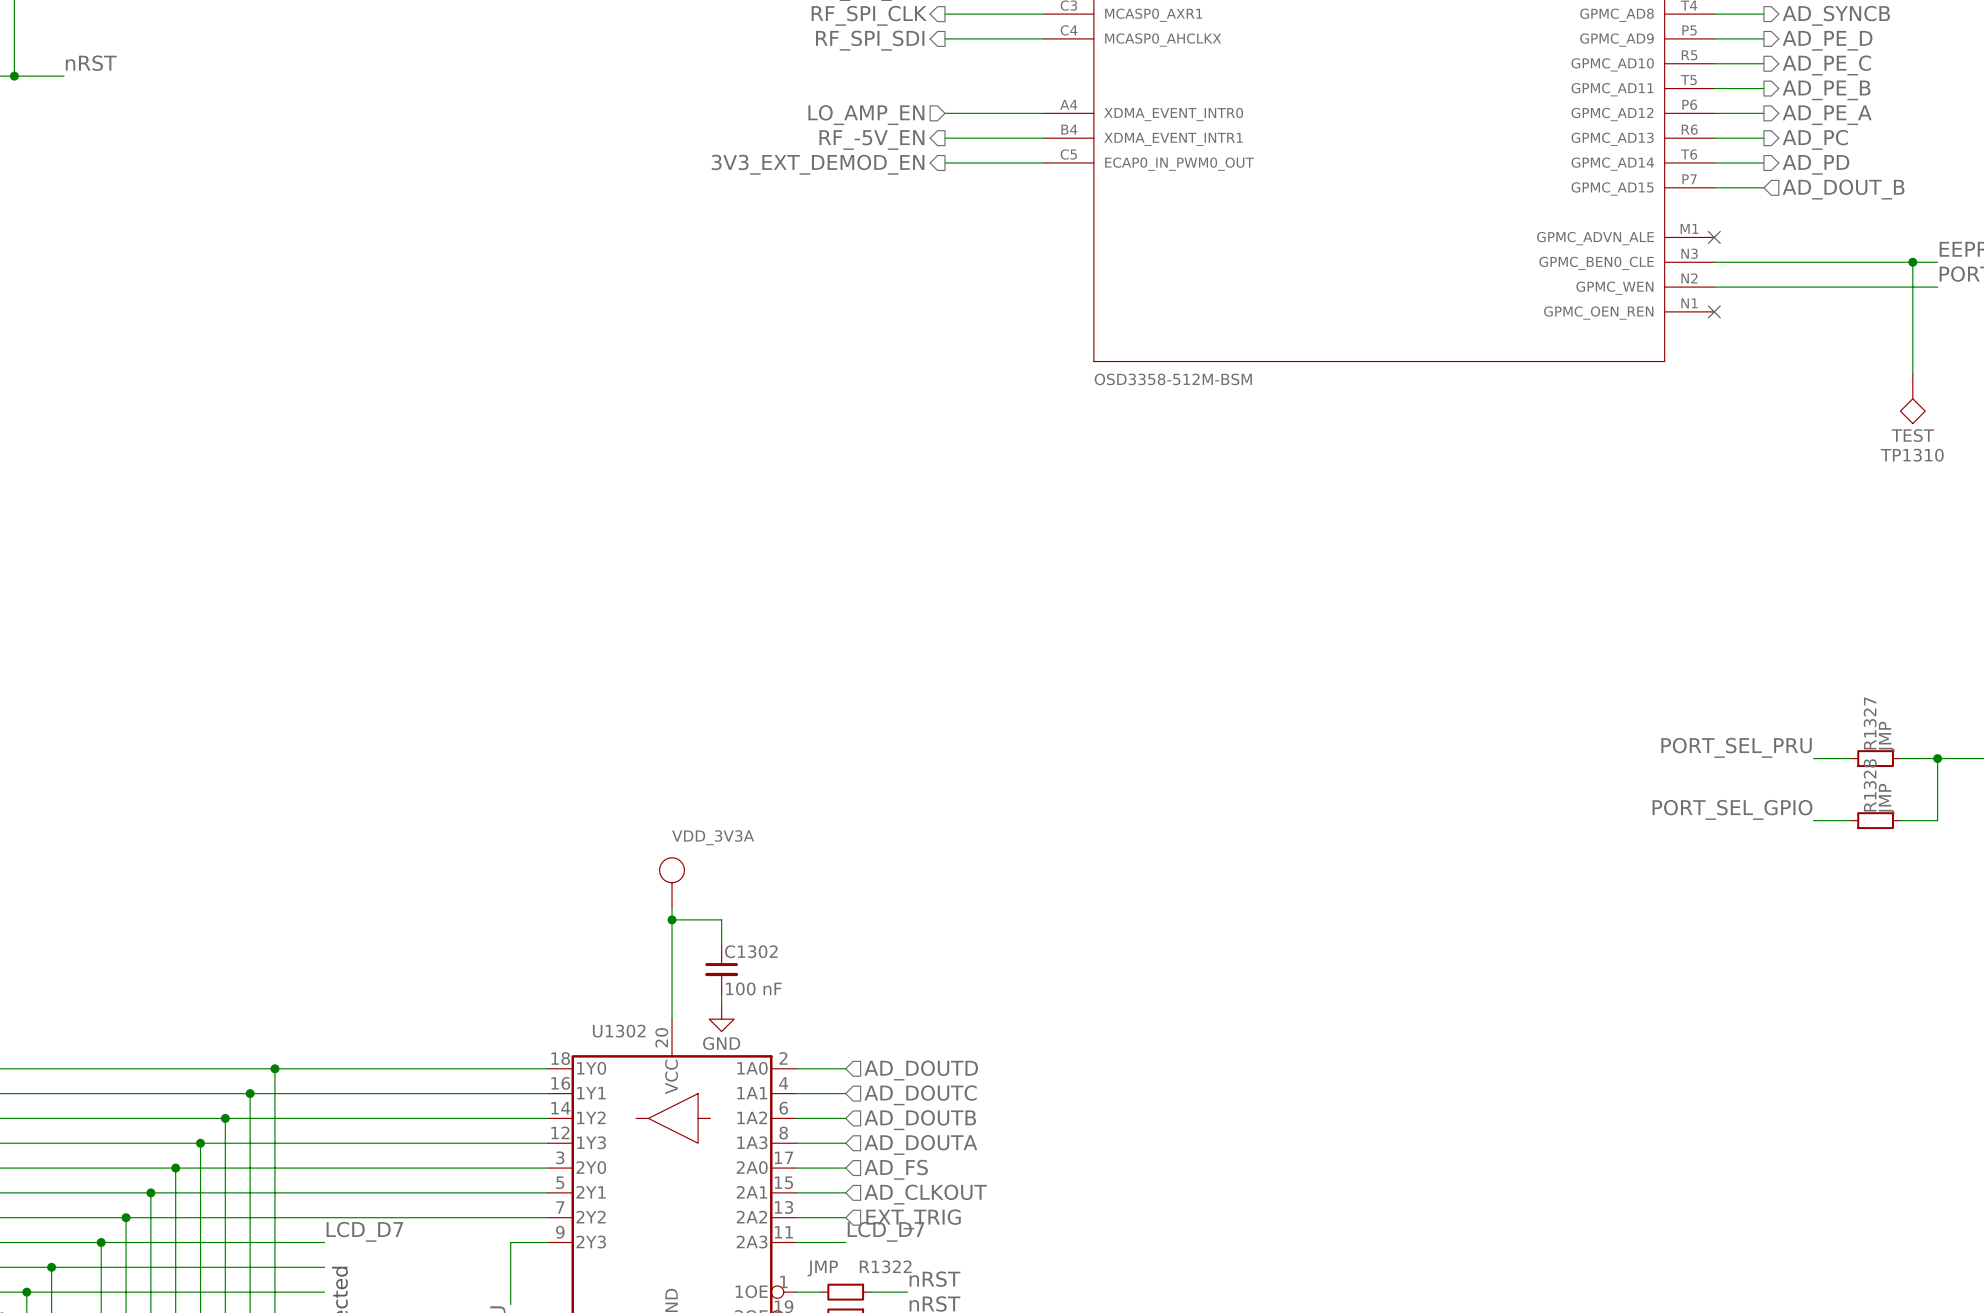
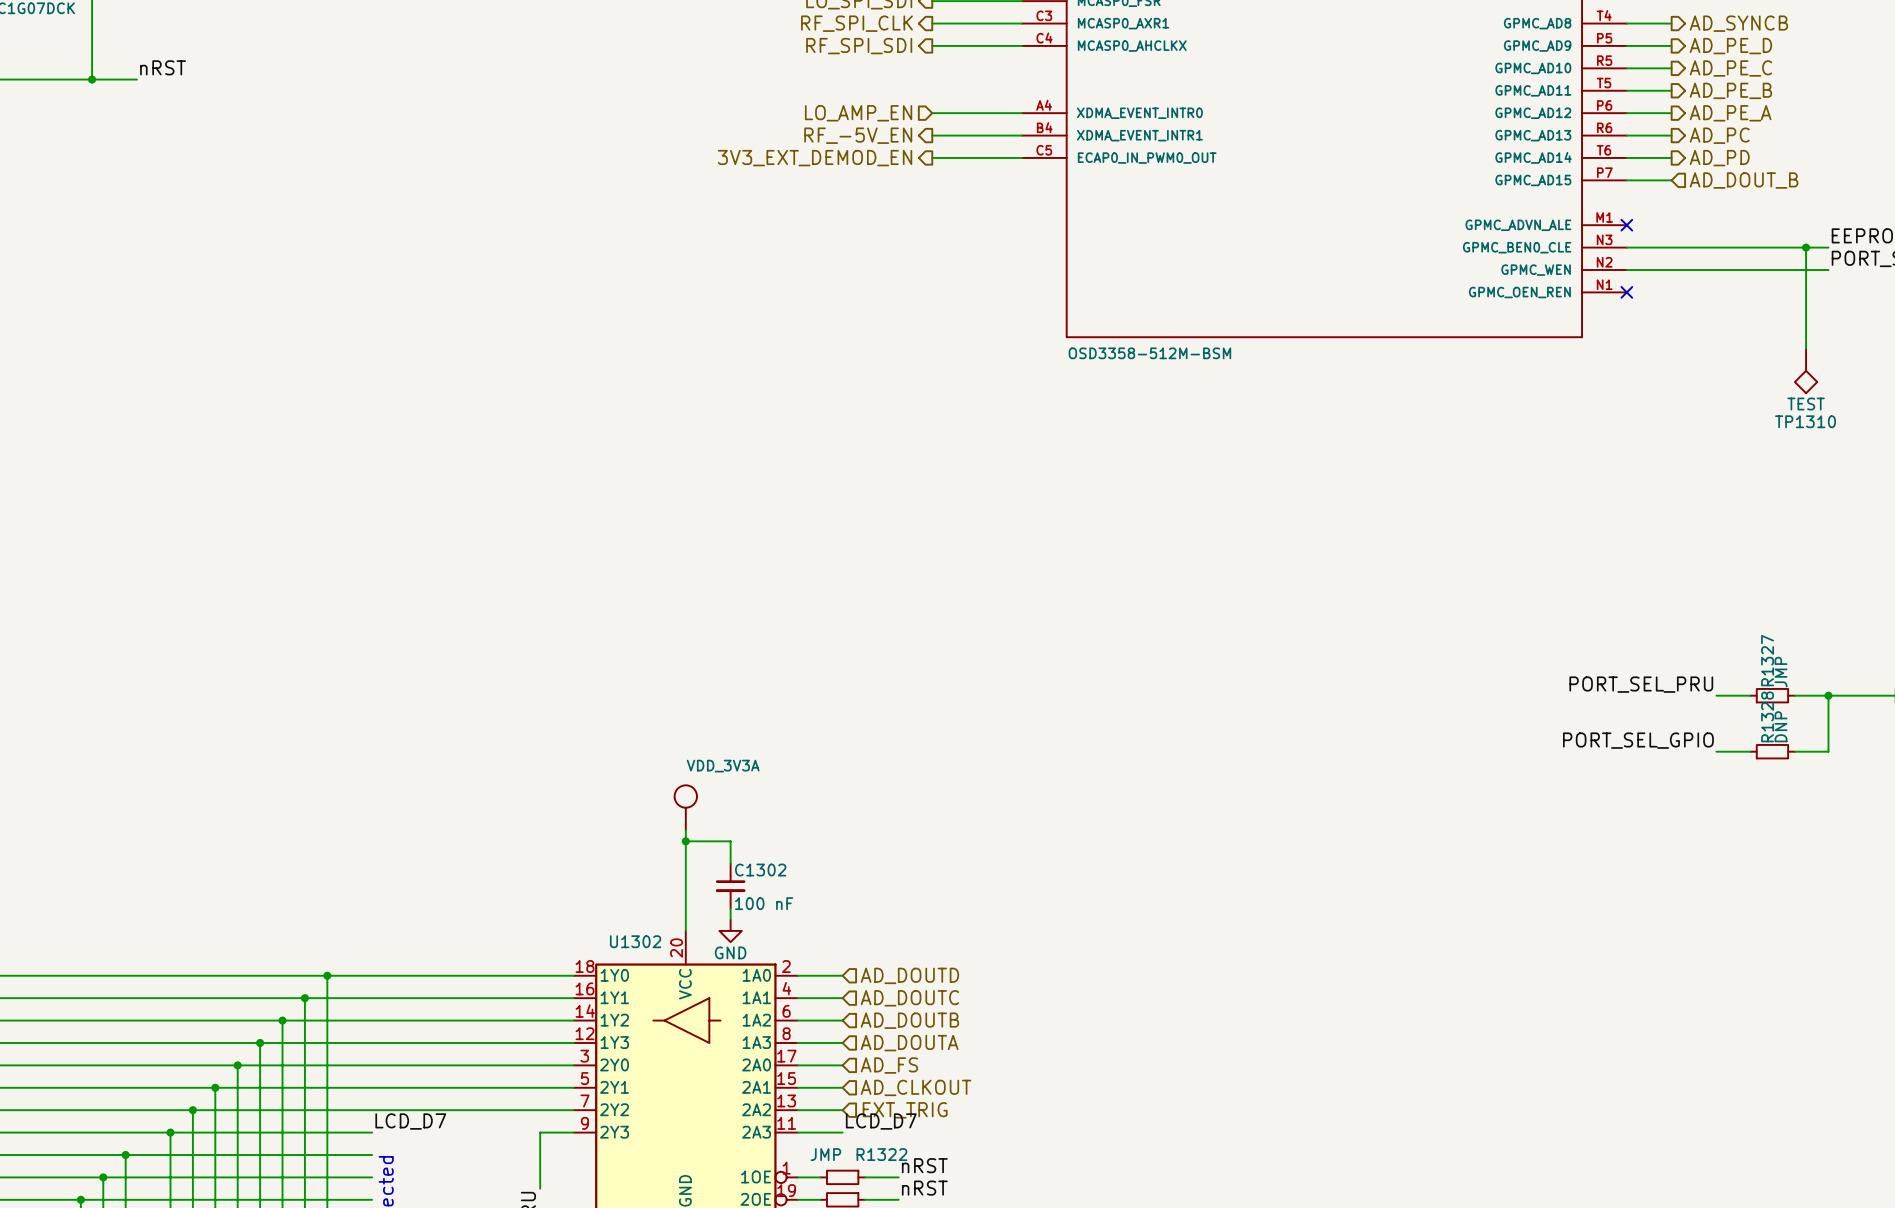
R1328 value: JMP (1886, 798) -> DNP (1781, 726)

